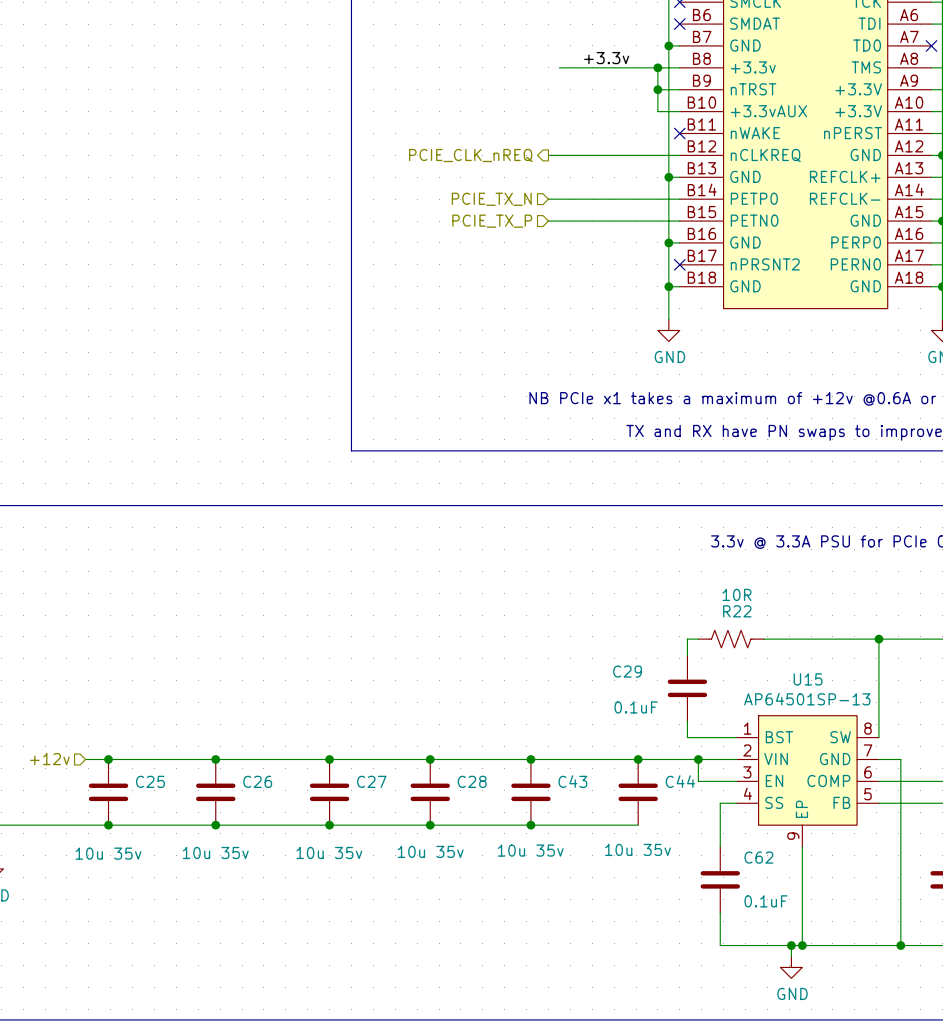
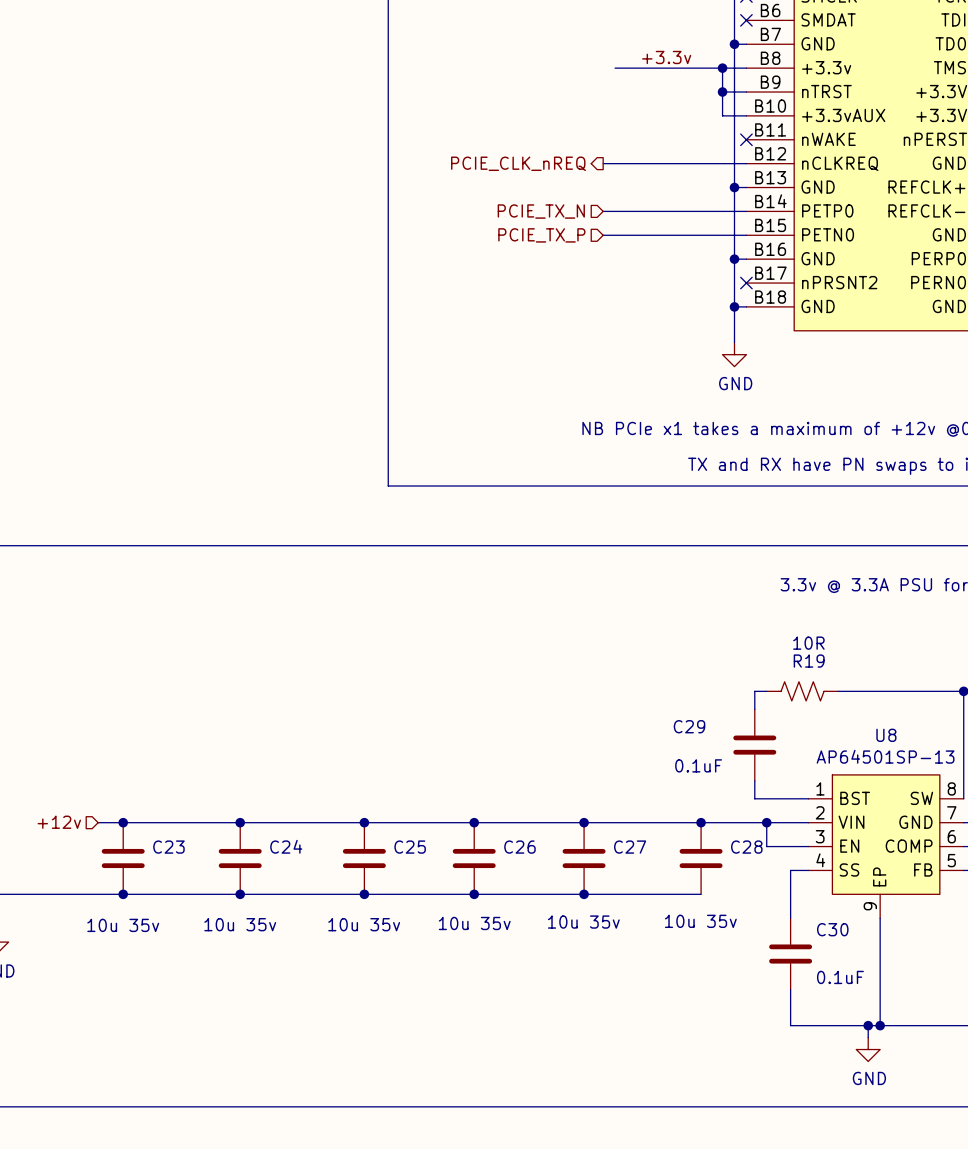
R22 name: R22 (737, 611) -> R19 (809, 661)
U15 name: U15 (808, 679) -> U8 (886, 735)
C25 name: C25 (150, 781) -> C23 (168, 847)
C26 name: C26 (257, 781) -> C24 (286, 846)
C27 name: C27 (371, 781) -> C25 (410, 847)
C28 name: C28 (472, 781) -> C26 (519, 847)
C43 name: C43 (572, 781) -> C27 (630, 847)
C44 name: C44 (680, 781) -> C28 (746, 847)
C62 name: C62 (758, 857) -> C30 (832, 929)

